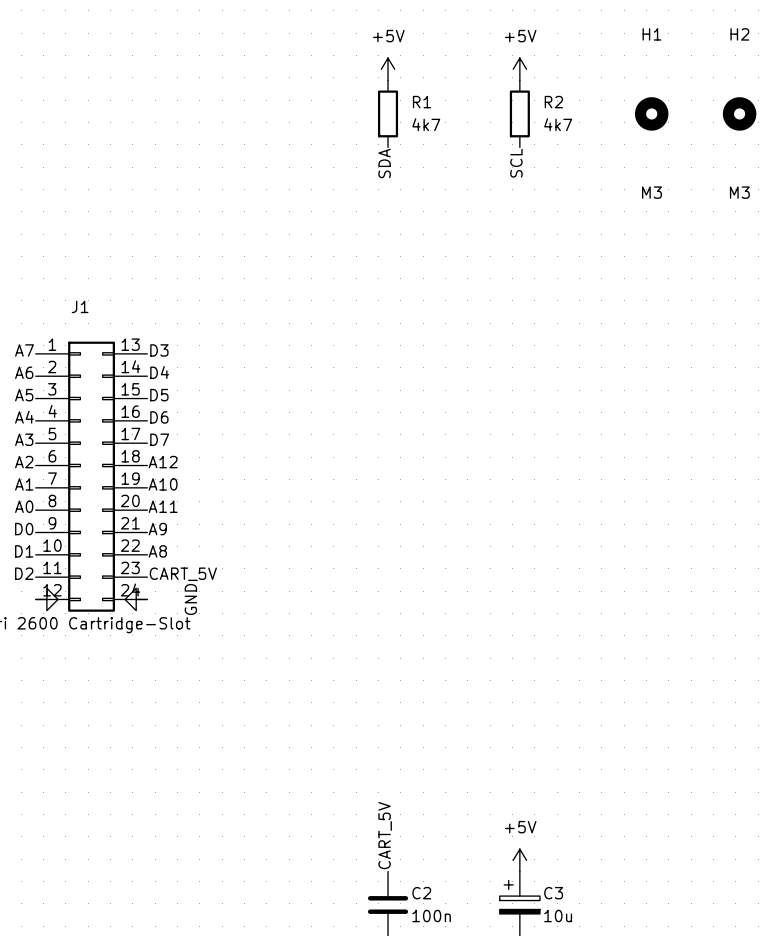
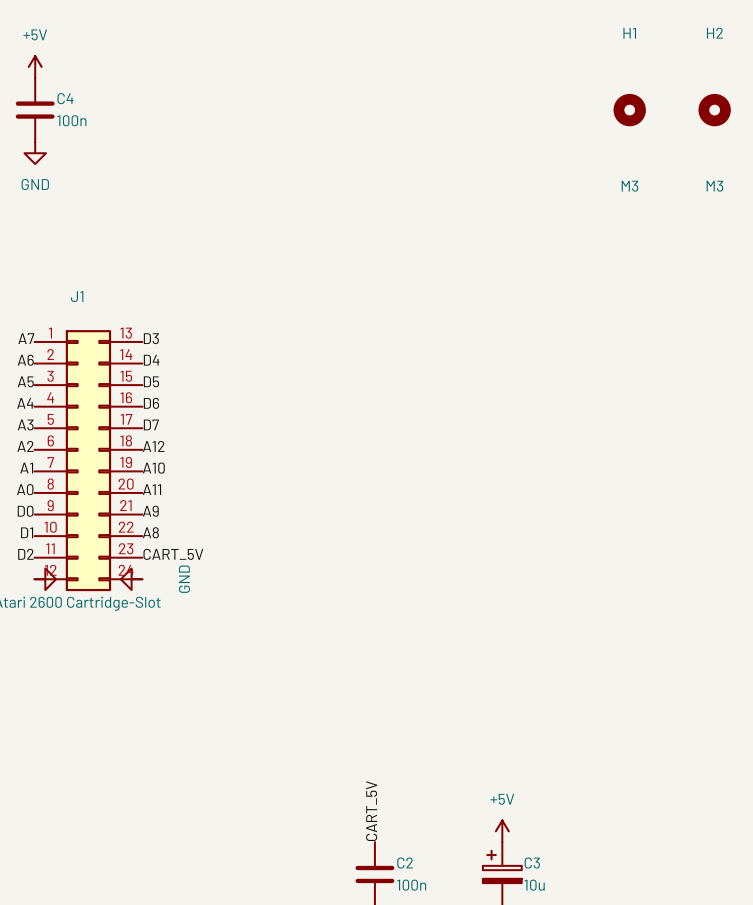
power symbol: none -> +5V (35, 66)
power symbol: +5V (388, 69) -> none
power symbol: +5V (519, 69) -> none
C4: none -> 100n (35, 110)
R1: 4k7 (388, 113) -> none
R2: 4k7 (519, 113) -> none
power symbol: none -> GND (35, 153)
label: SDA (384, 163) -> none
label: SCL (516, 163) -> none

